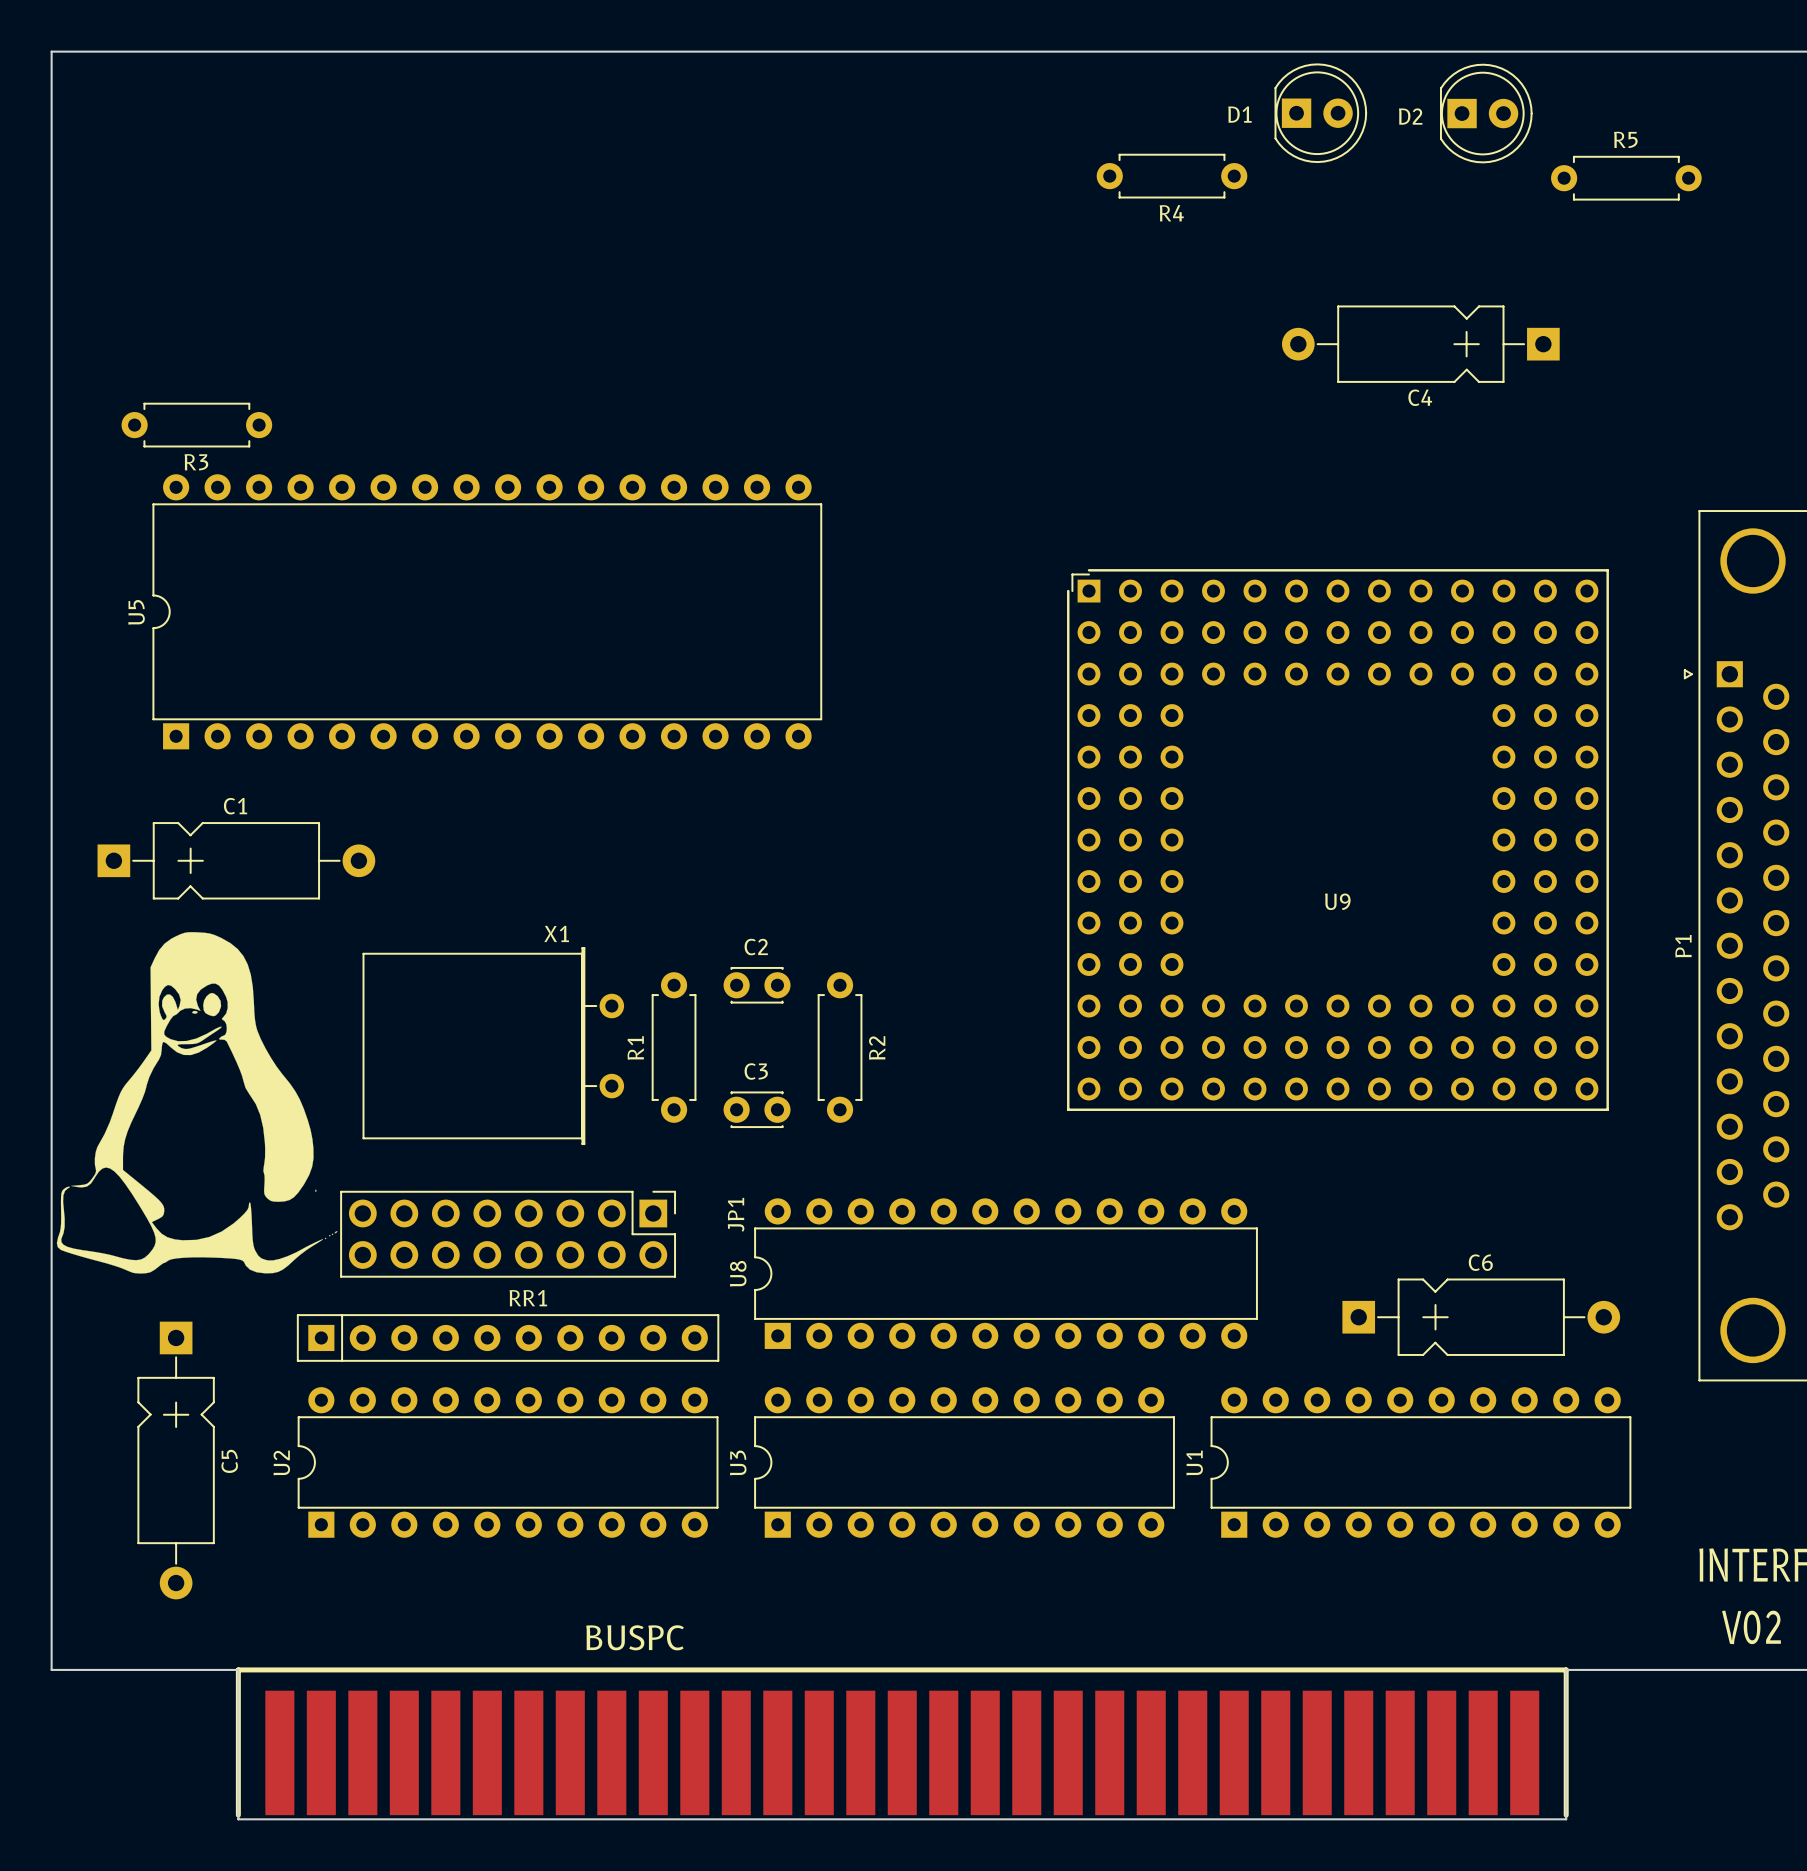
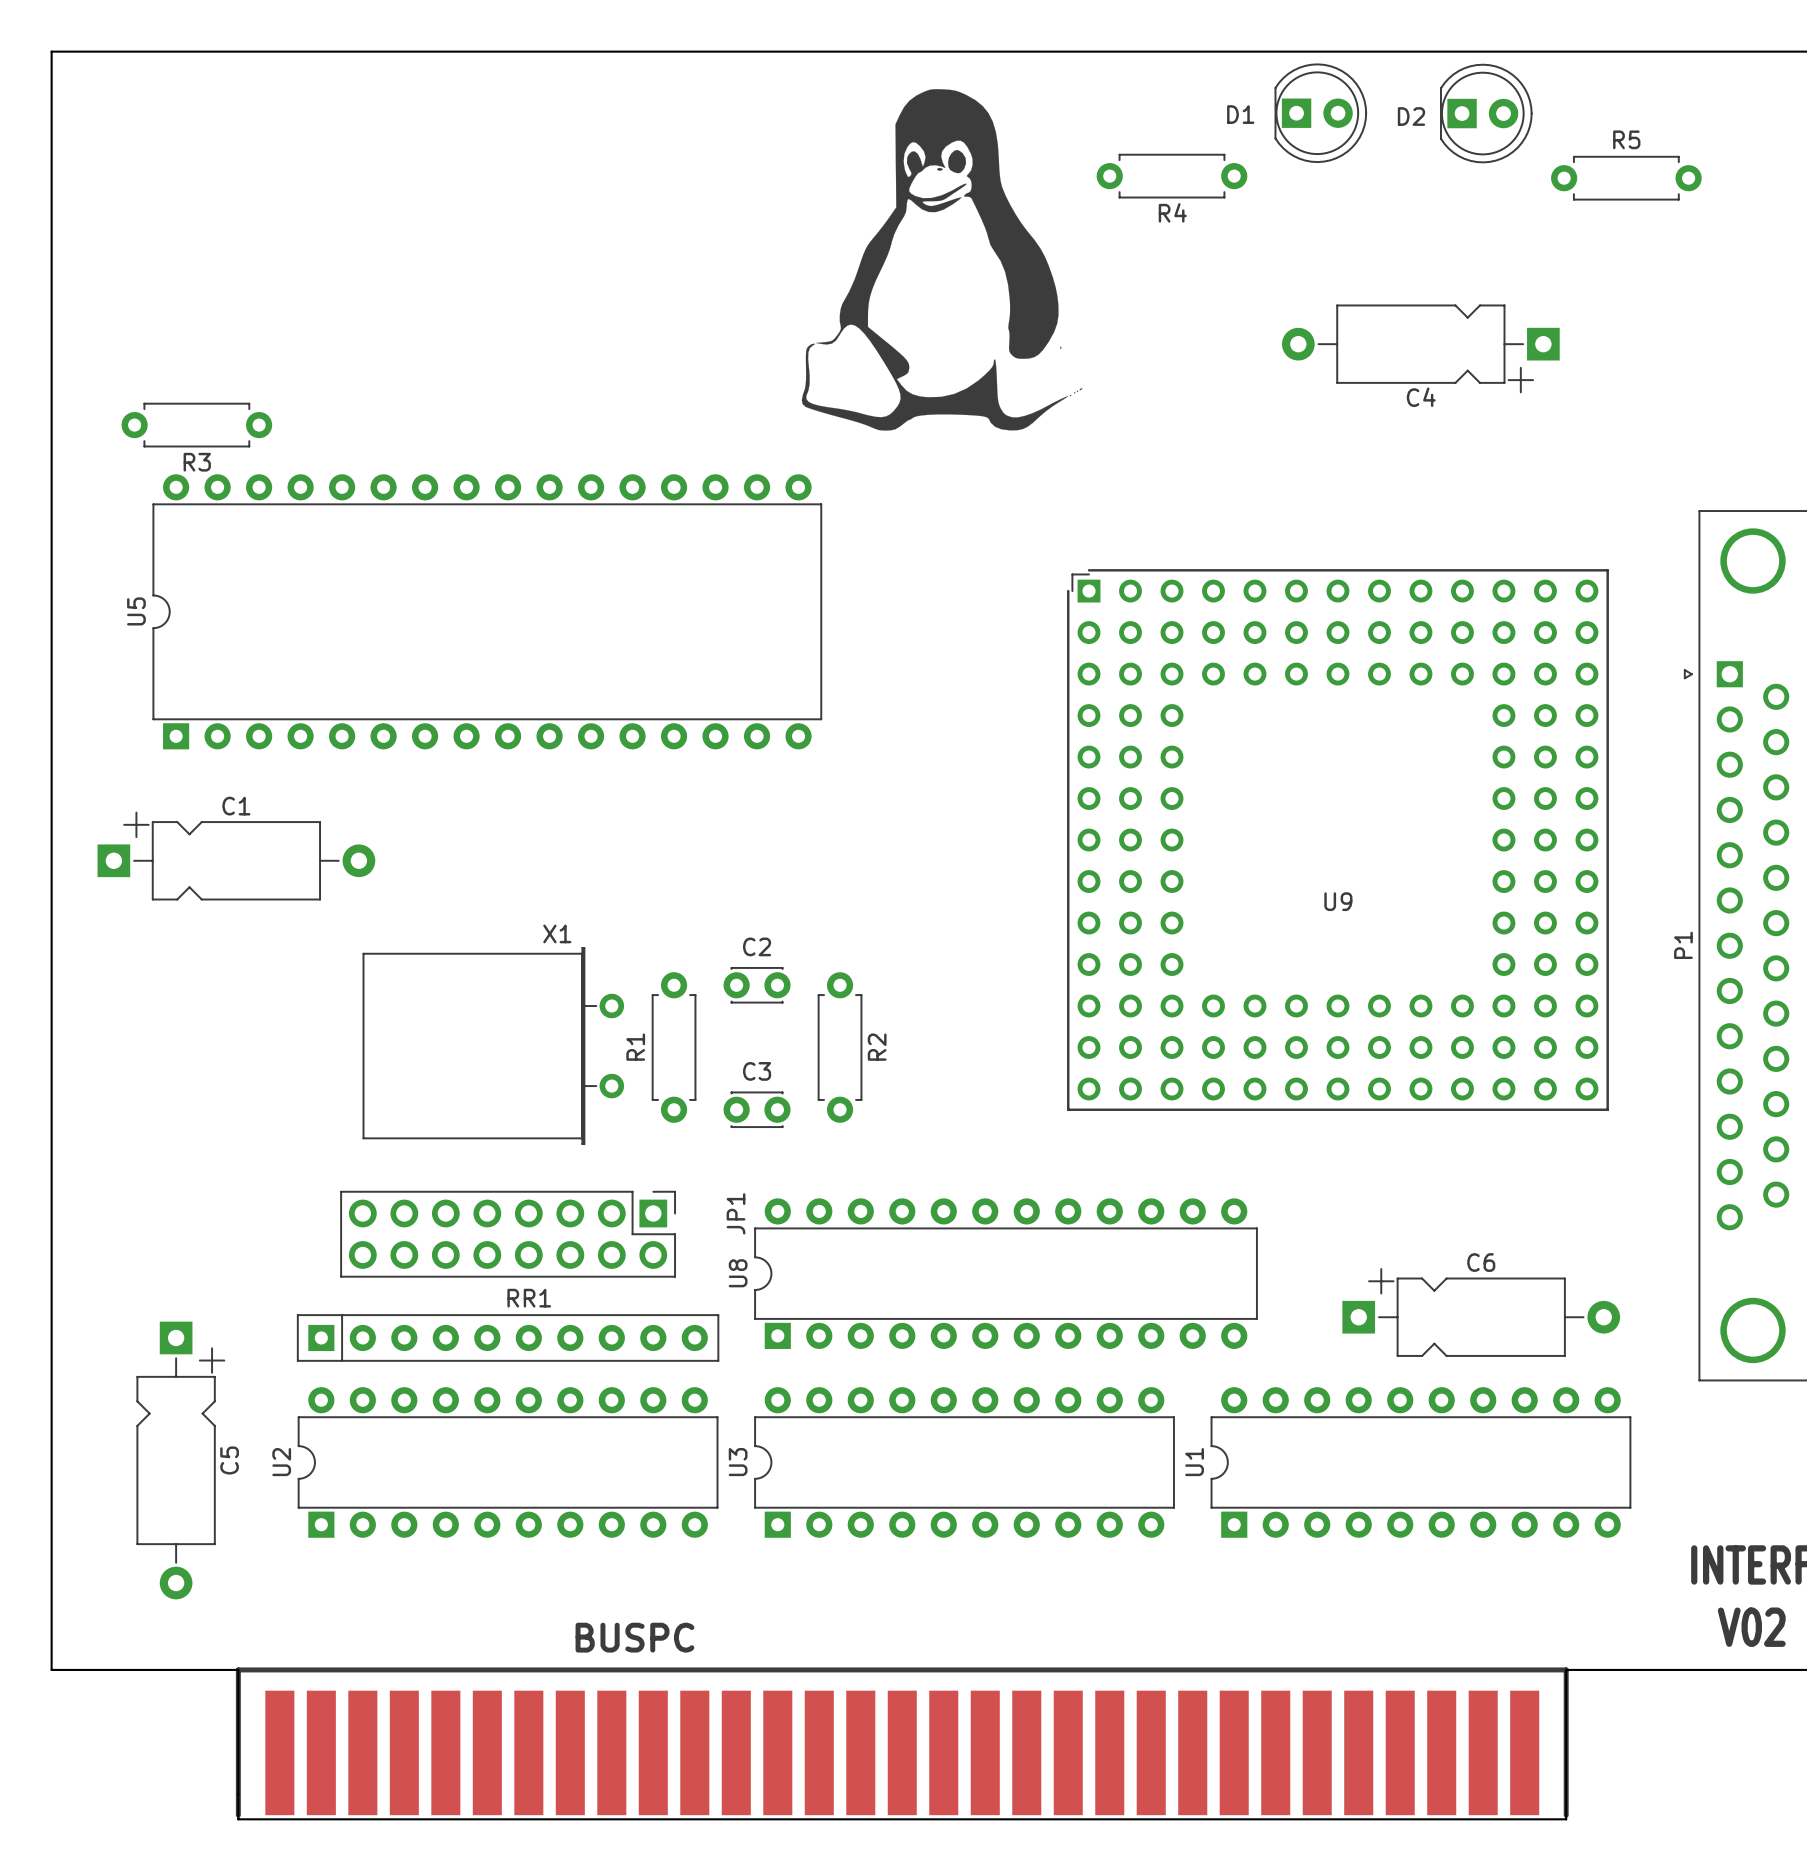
drawing: none -> [801, 89, 1083, 431]
C4 footprint: [1281, 305, 1560, 383] -> [1281, 304, 1560, 394]
C1 footprint: [97, 822, 376, 900] -> [97, 811, 376, 901]
drawing: [56, 932, 338, 1274] -> none
C6 footprint: [1342, 1278, 1621, 1356] -> [1342, 1268, 1621, 1357]
C5 footprint: [137, 1321, 215, 1600] -> [136, 1321, 226, 1600]

